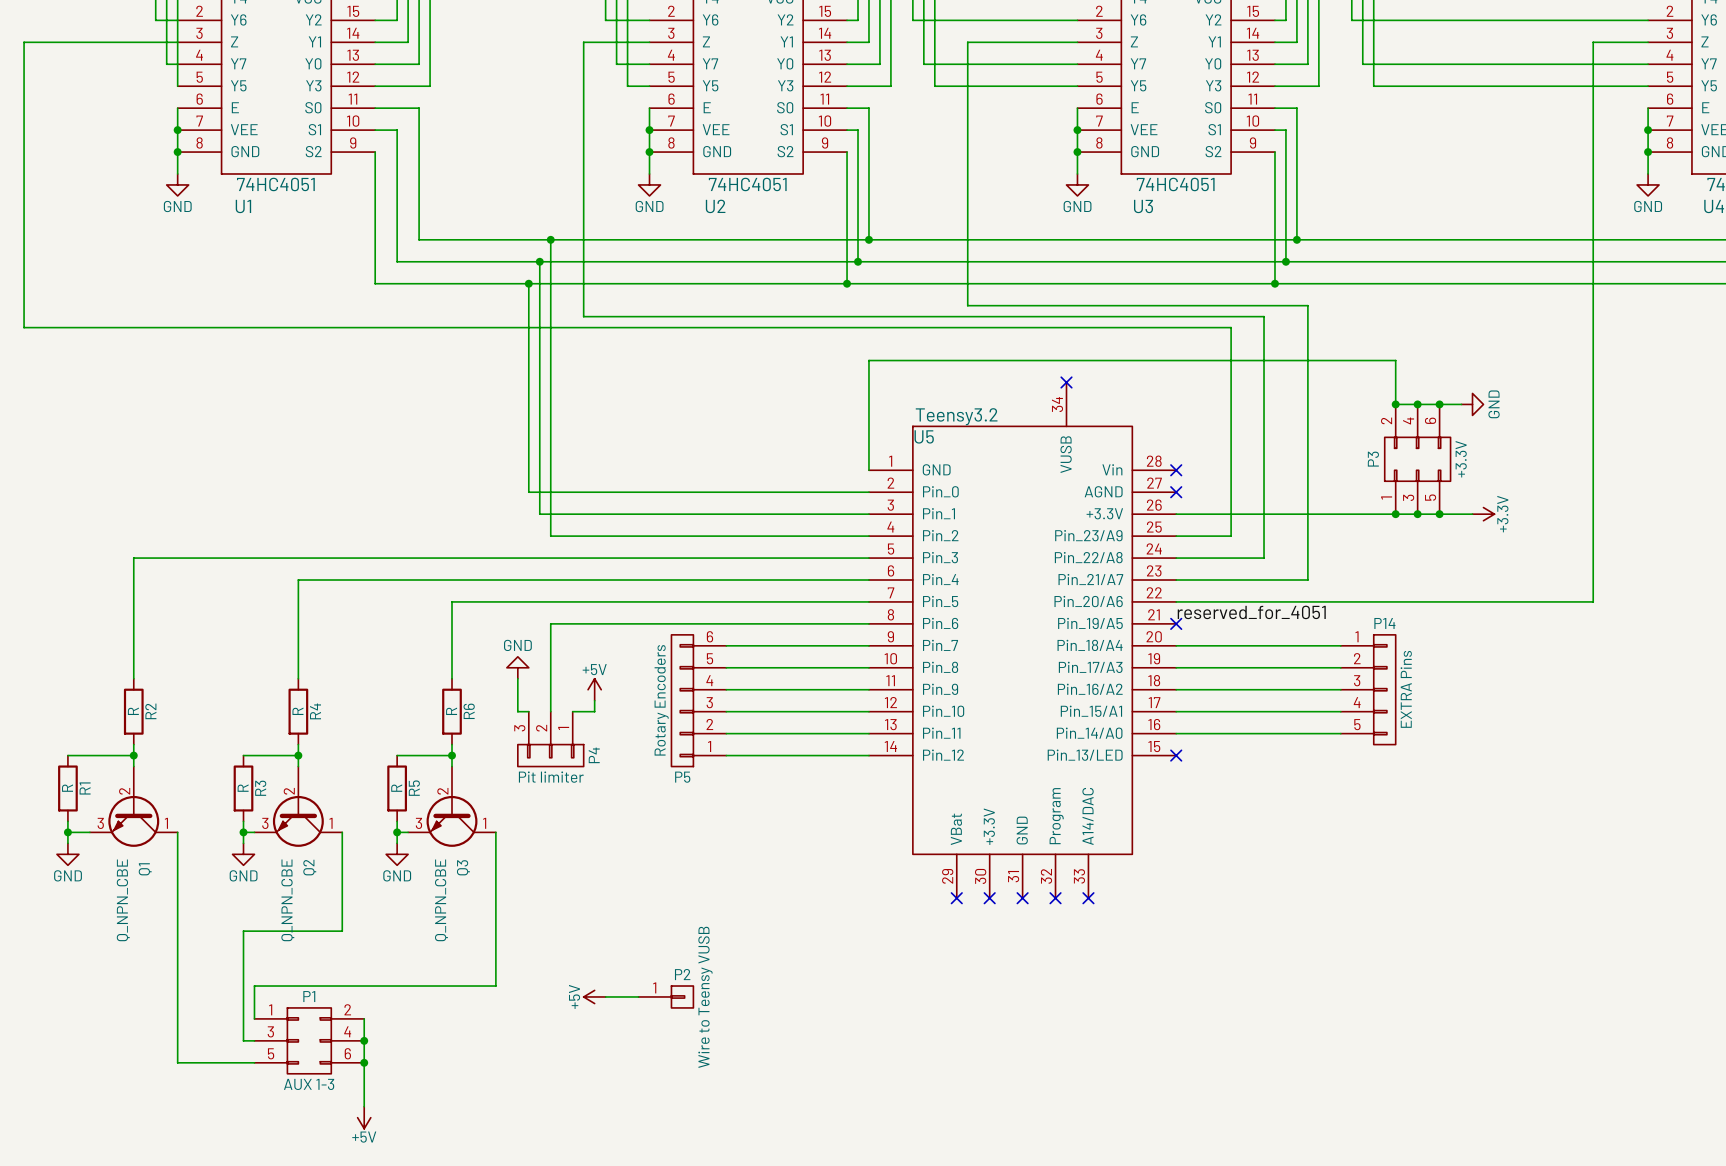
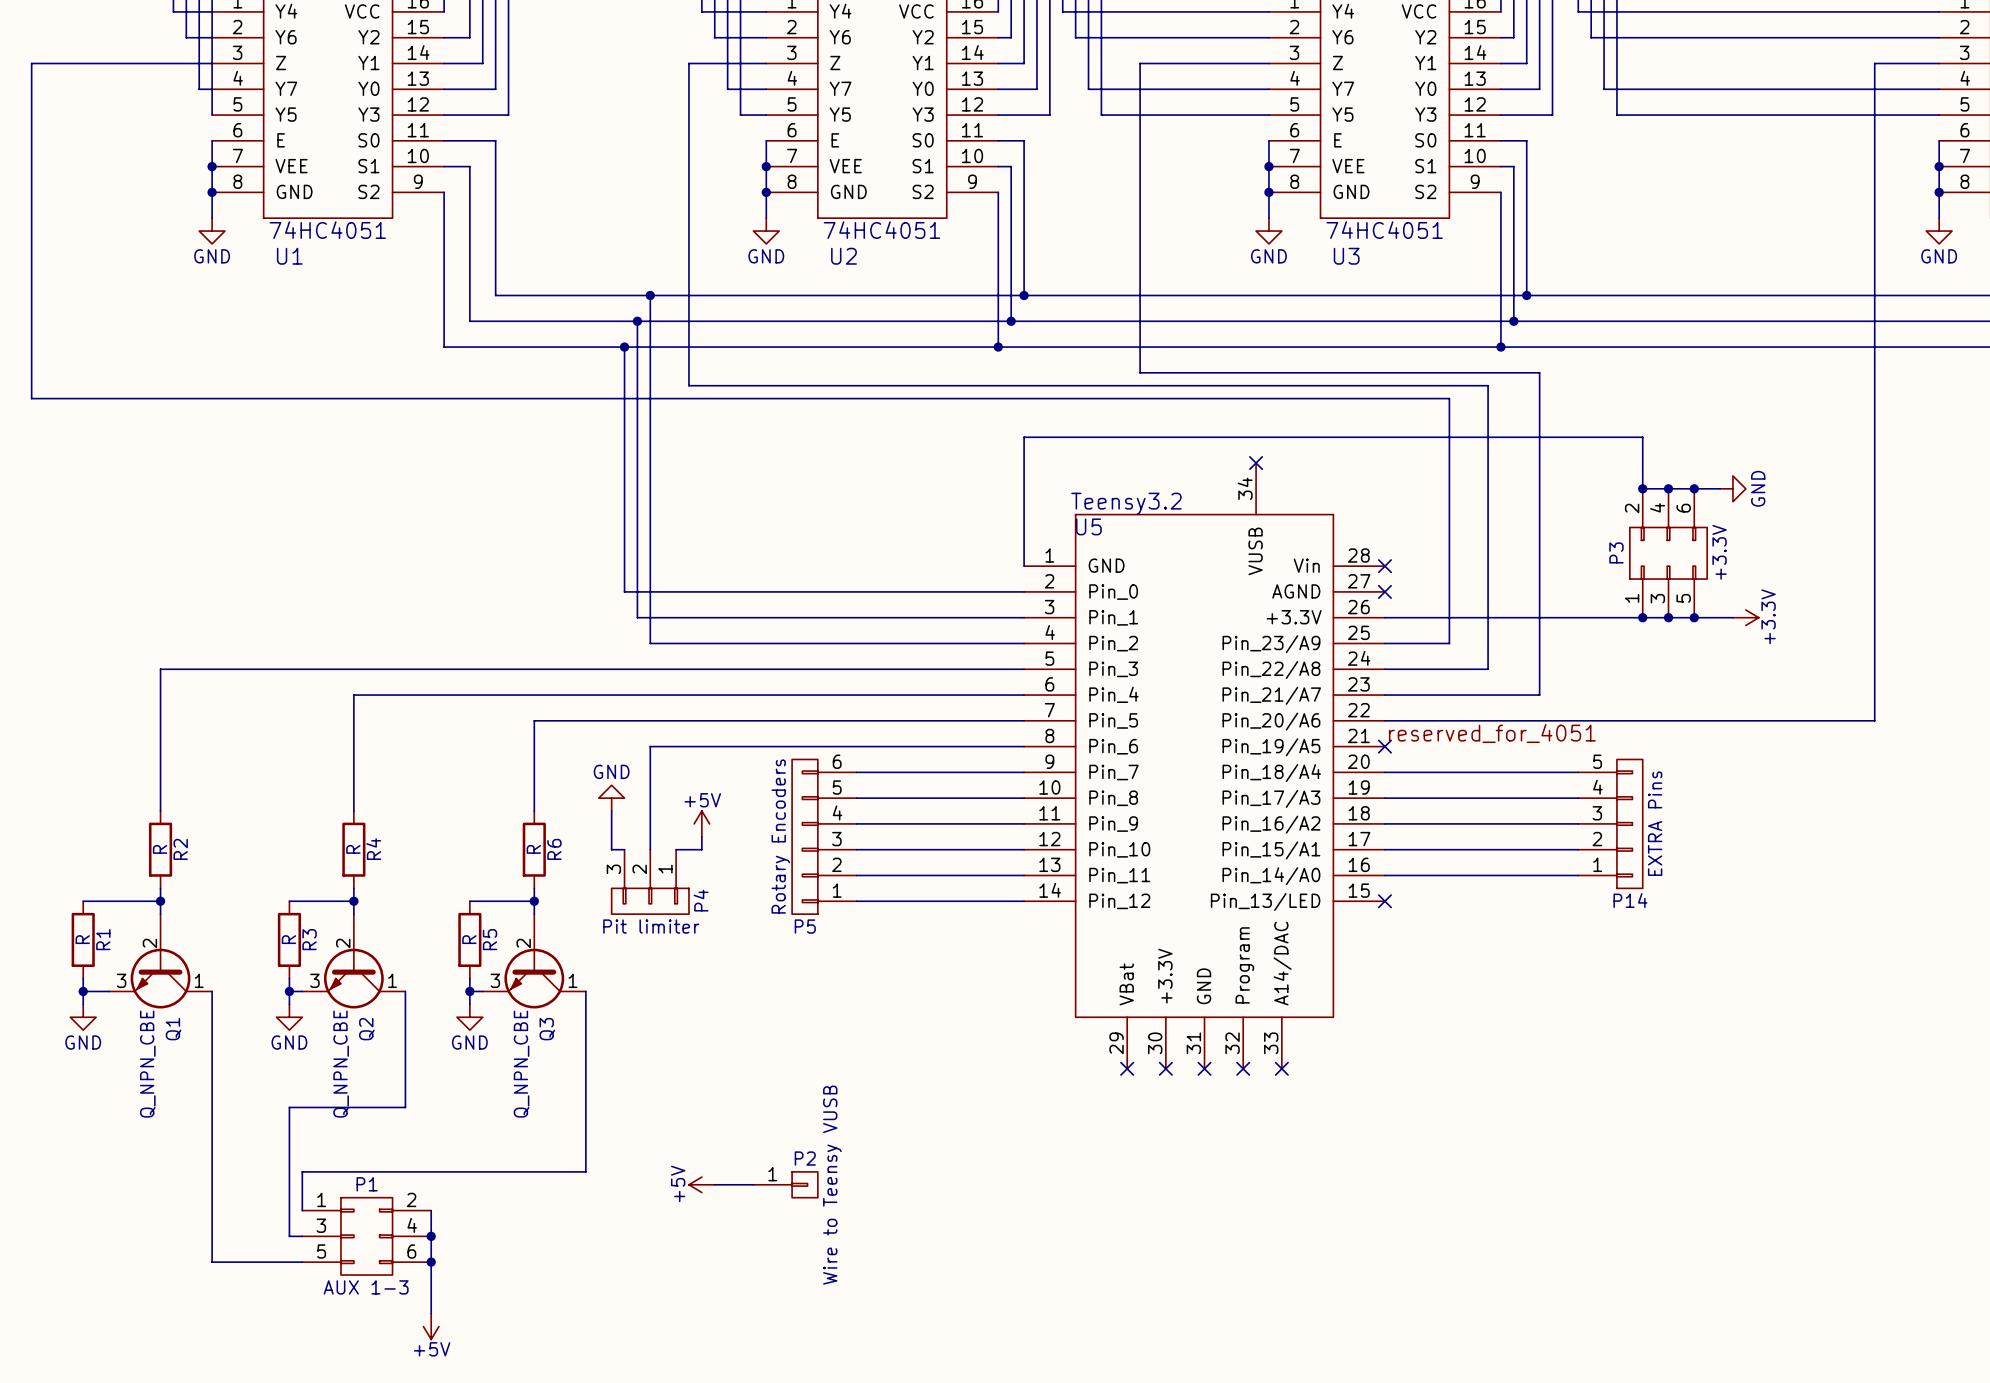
P14 flip: as is (1384, 689) -> up-down (1629, 823)

